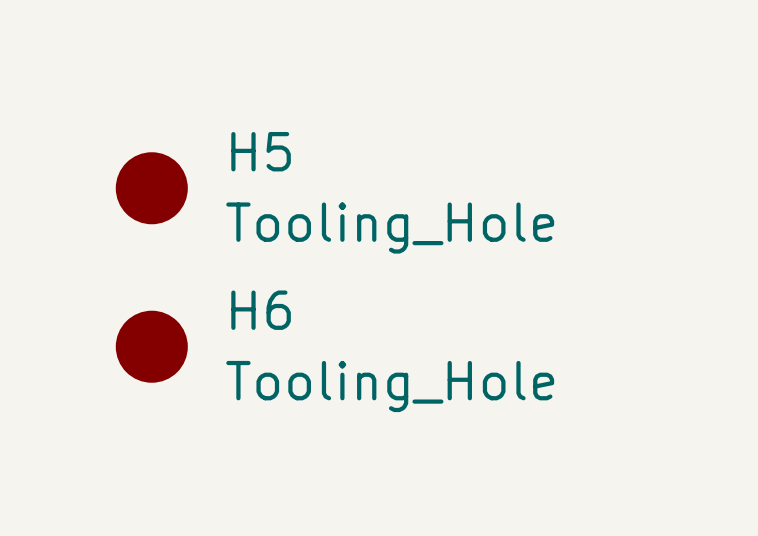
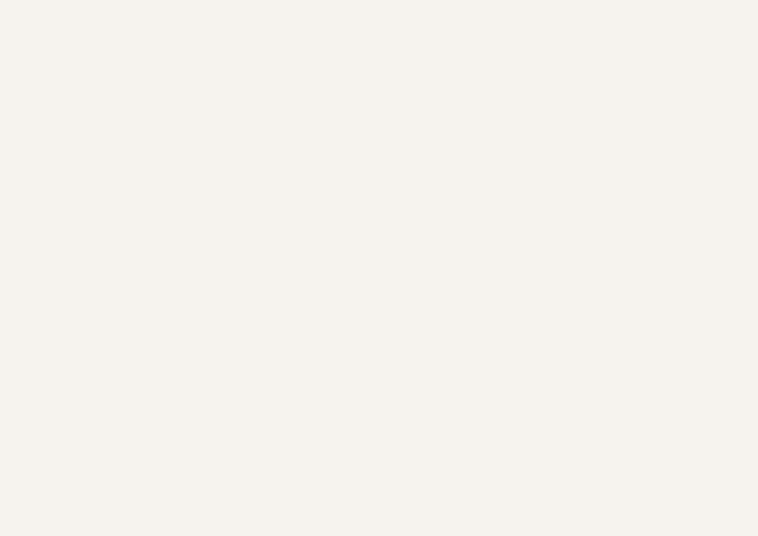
H5: Tooling_Hole (151, 188) -> none
H6: Tooling_Hole (151, 346) -> none

